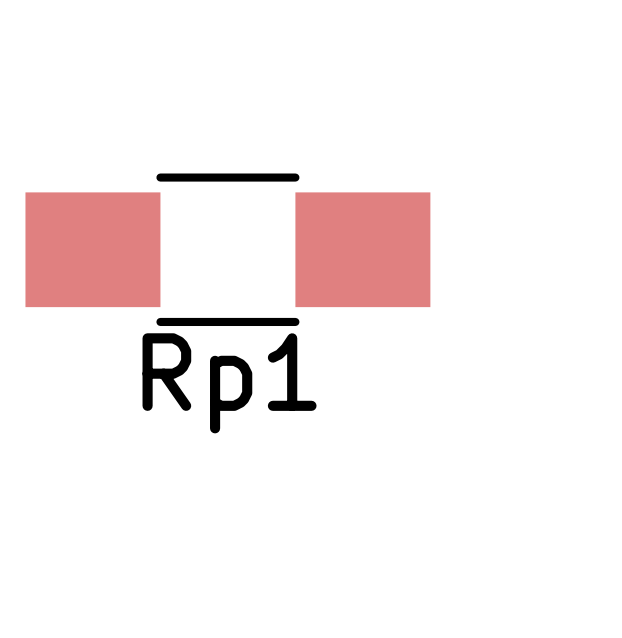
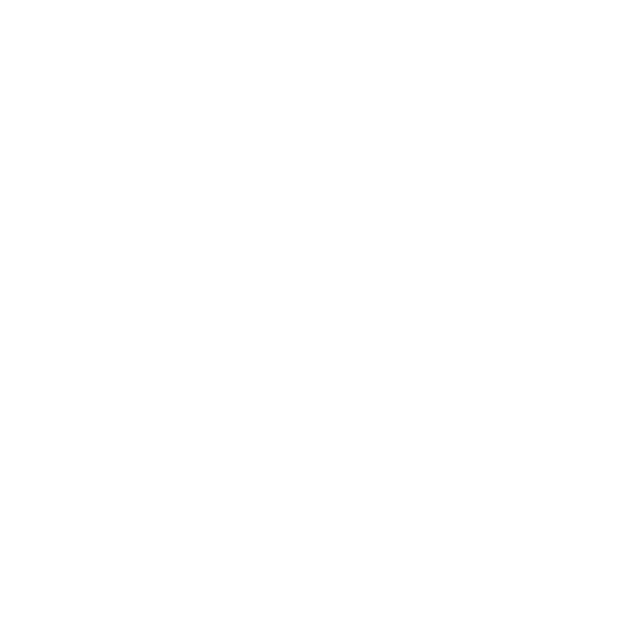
Rp1: (227, 249) -> none

